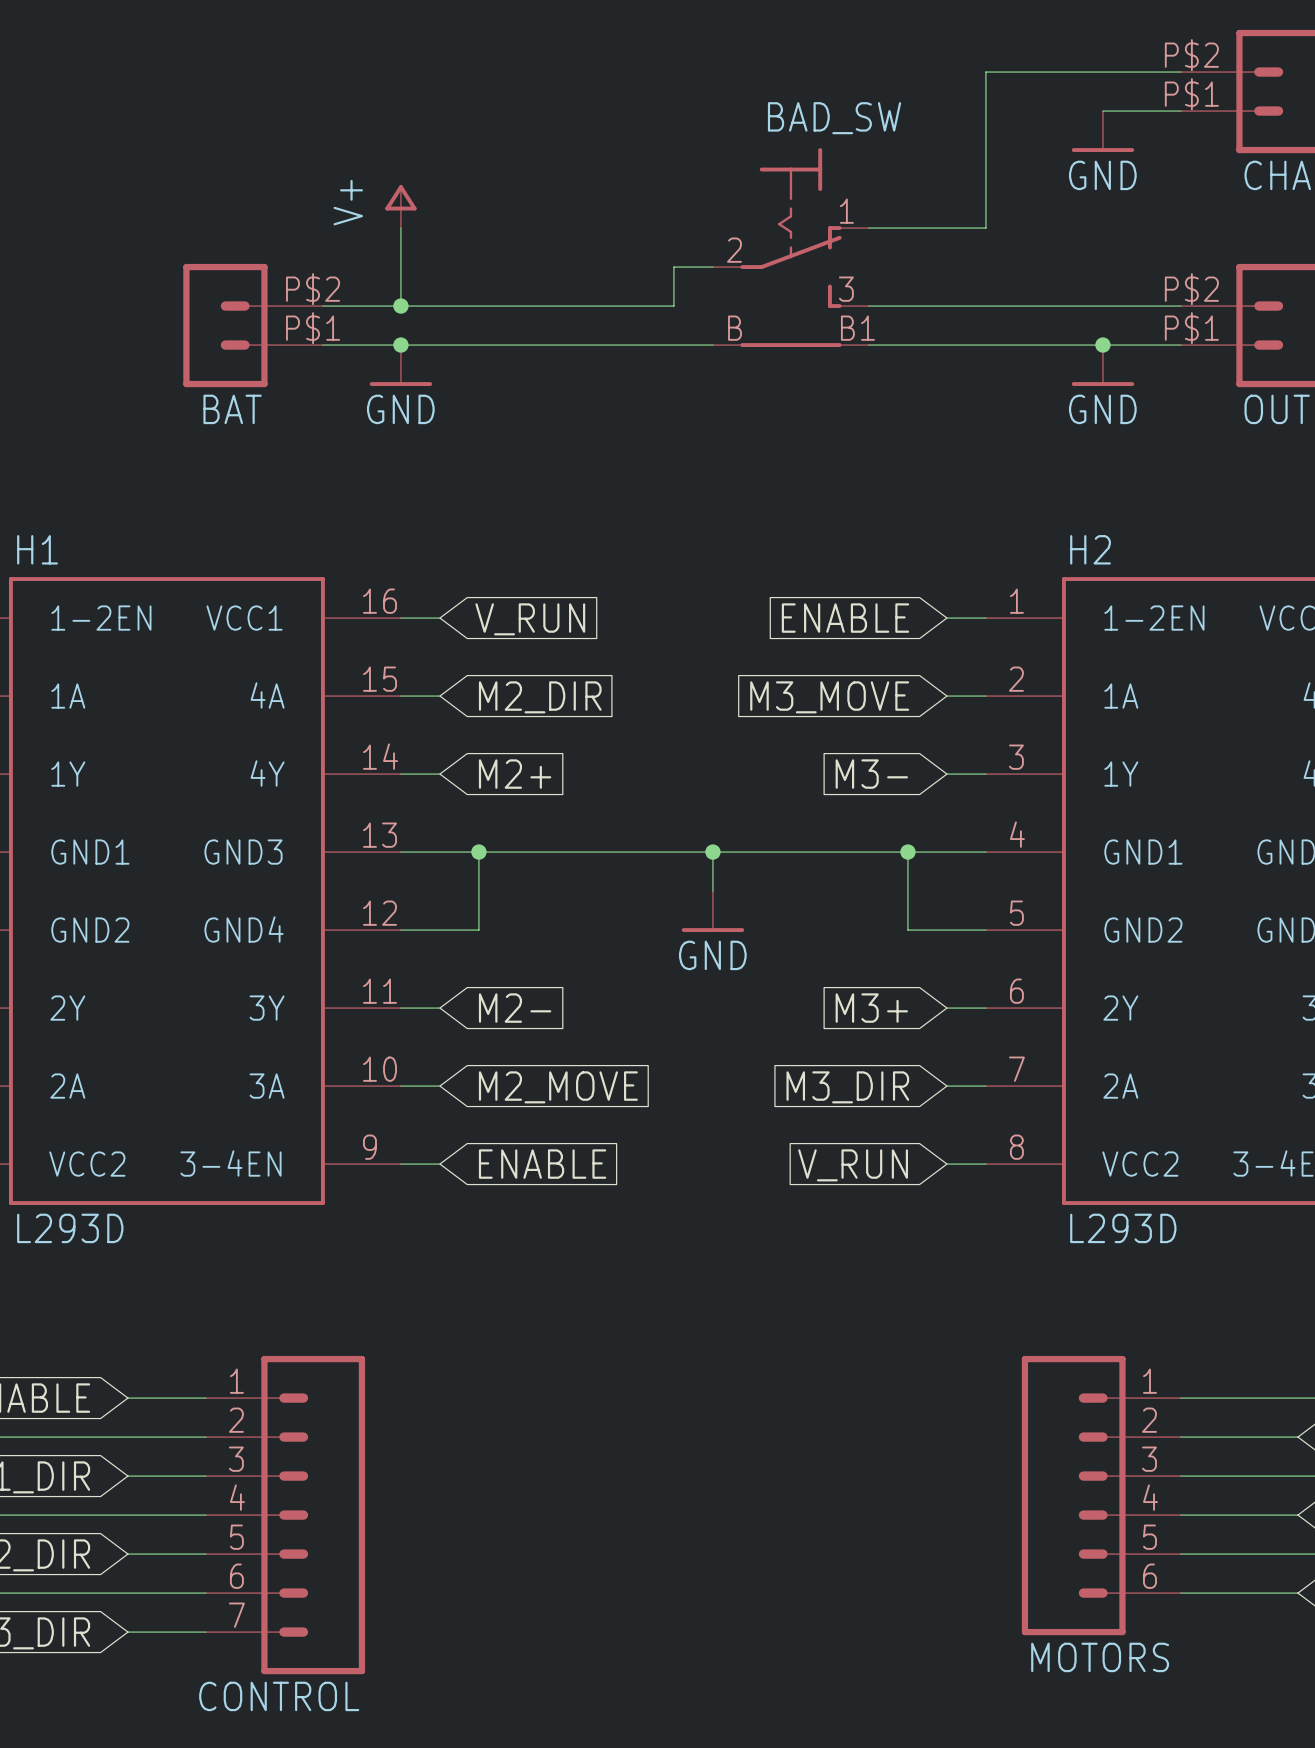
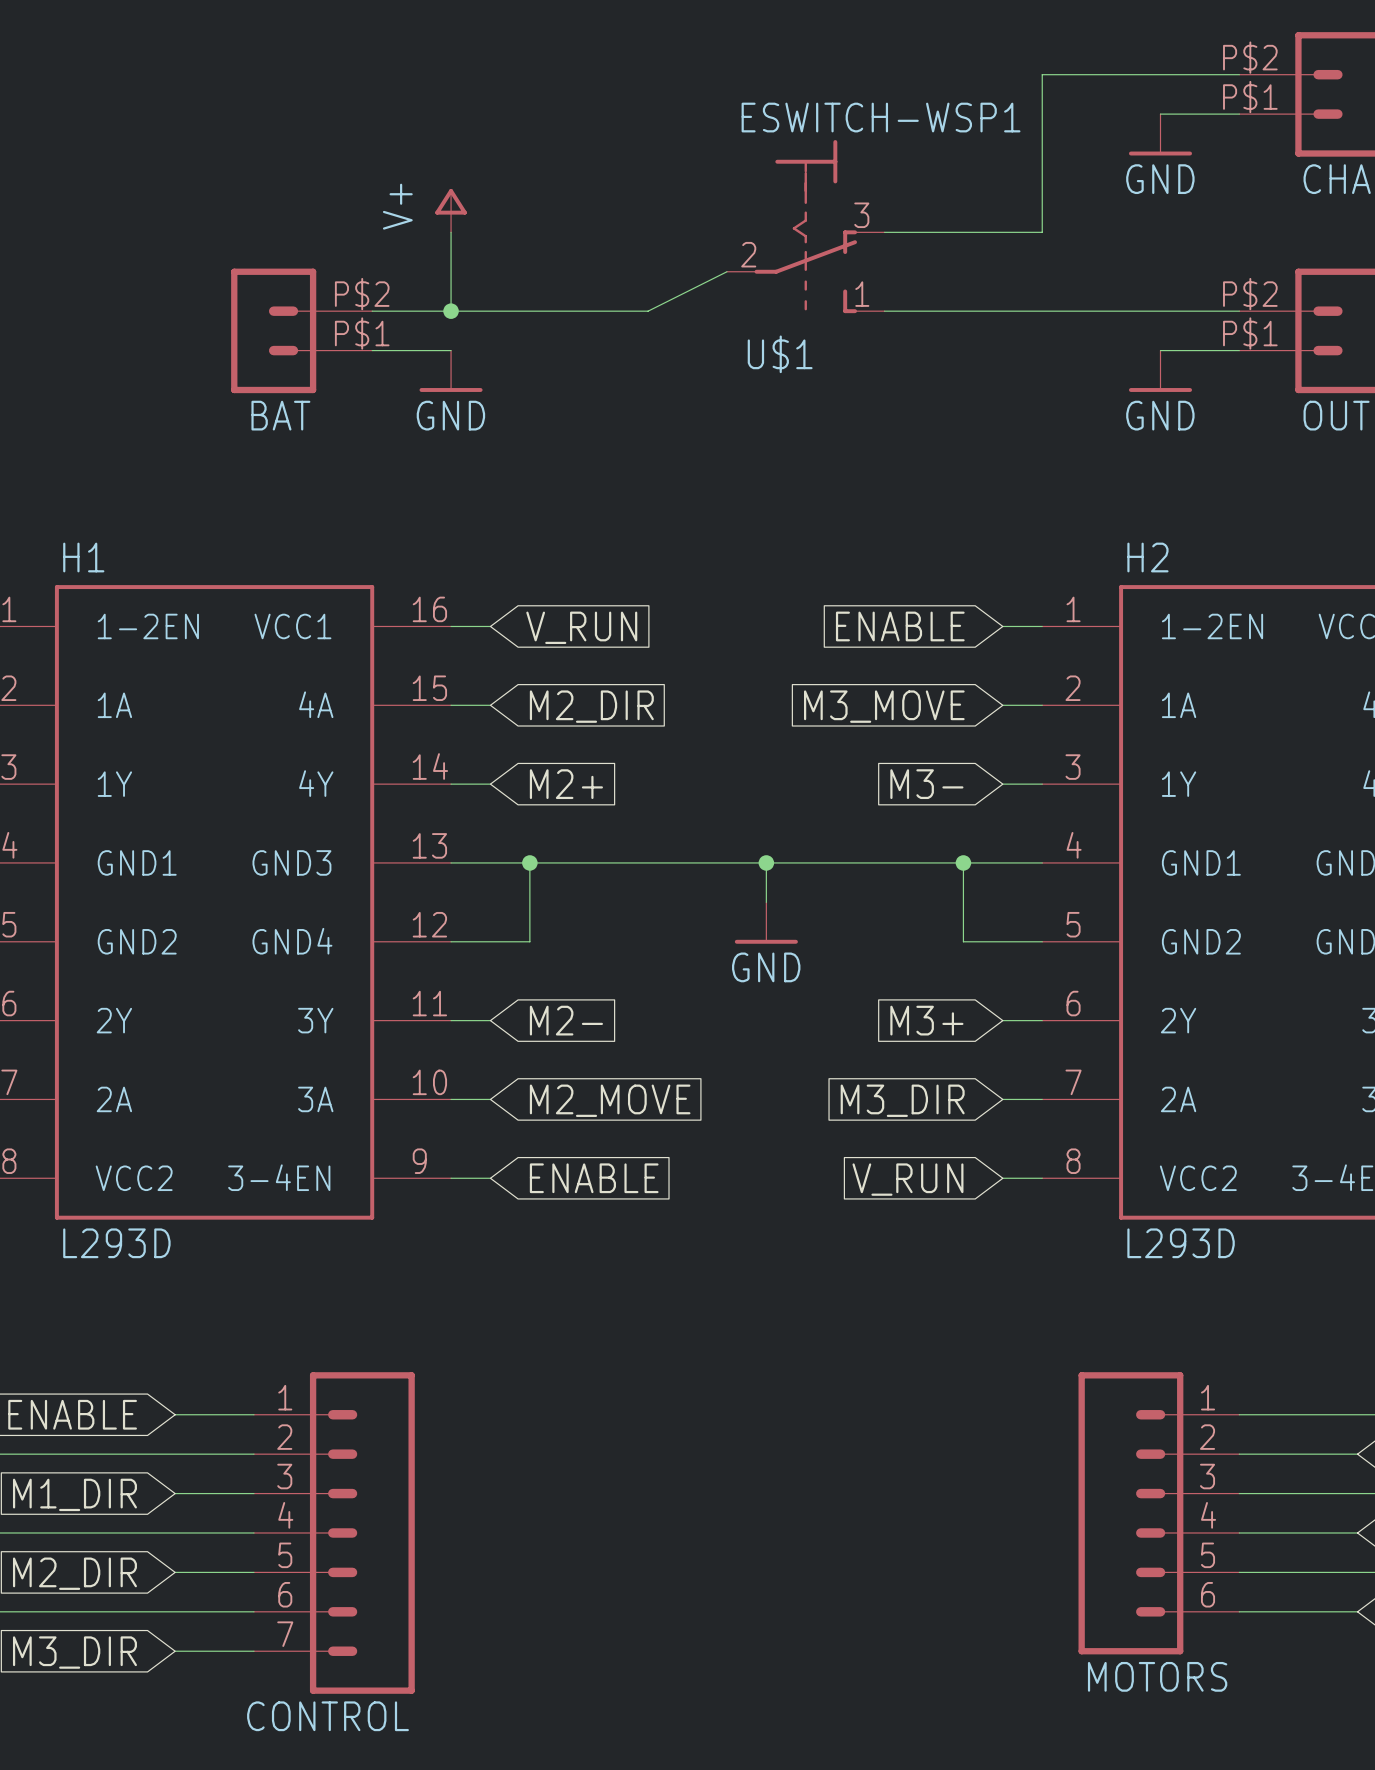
U$1: none -> ESWITCH-WSP1 (805, 226)
BAD_SW: (790, 247) -> none
wire: (712, 267) (673, 267) (673, 306) (595, 306) -> (726, 271) (648, 311)
wire: (400, 345) (712, 345) -> none
junction: (400, 345) -> none
wire: (868, 345) (1102, 345) -> none
junction: (1102, 345) -> none

